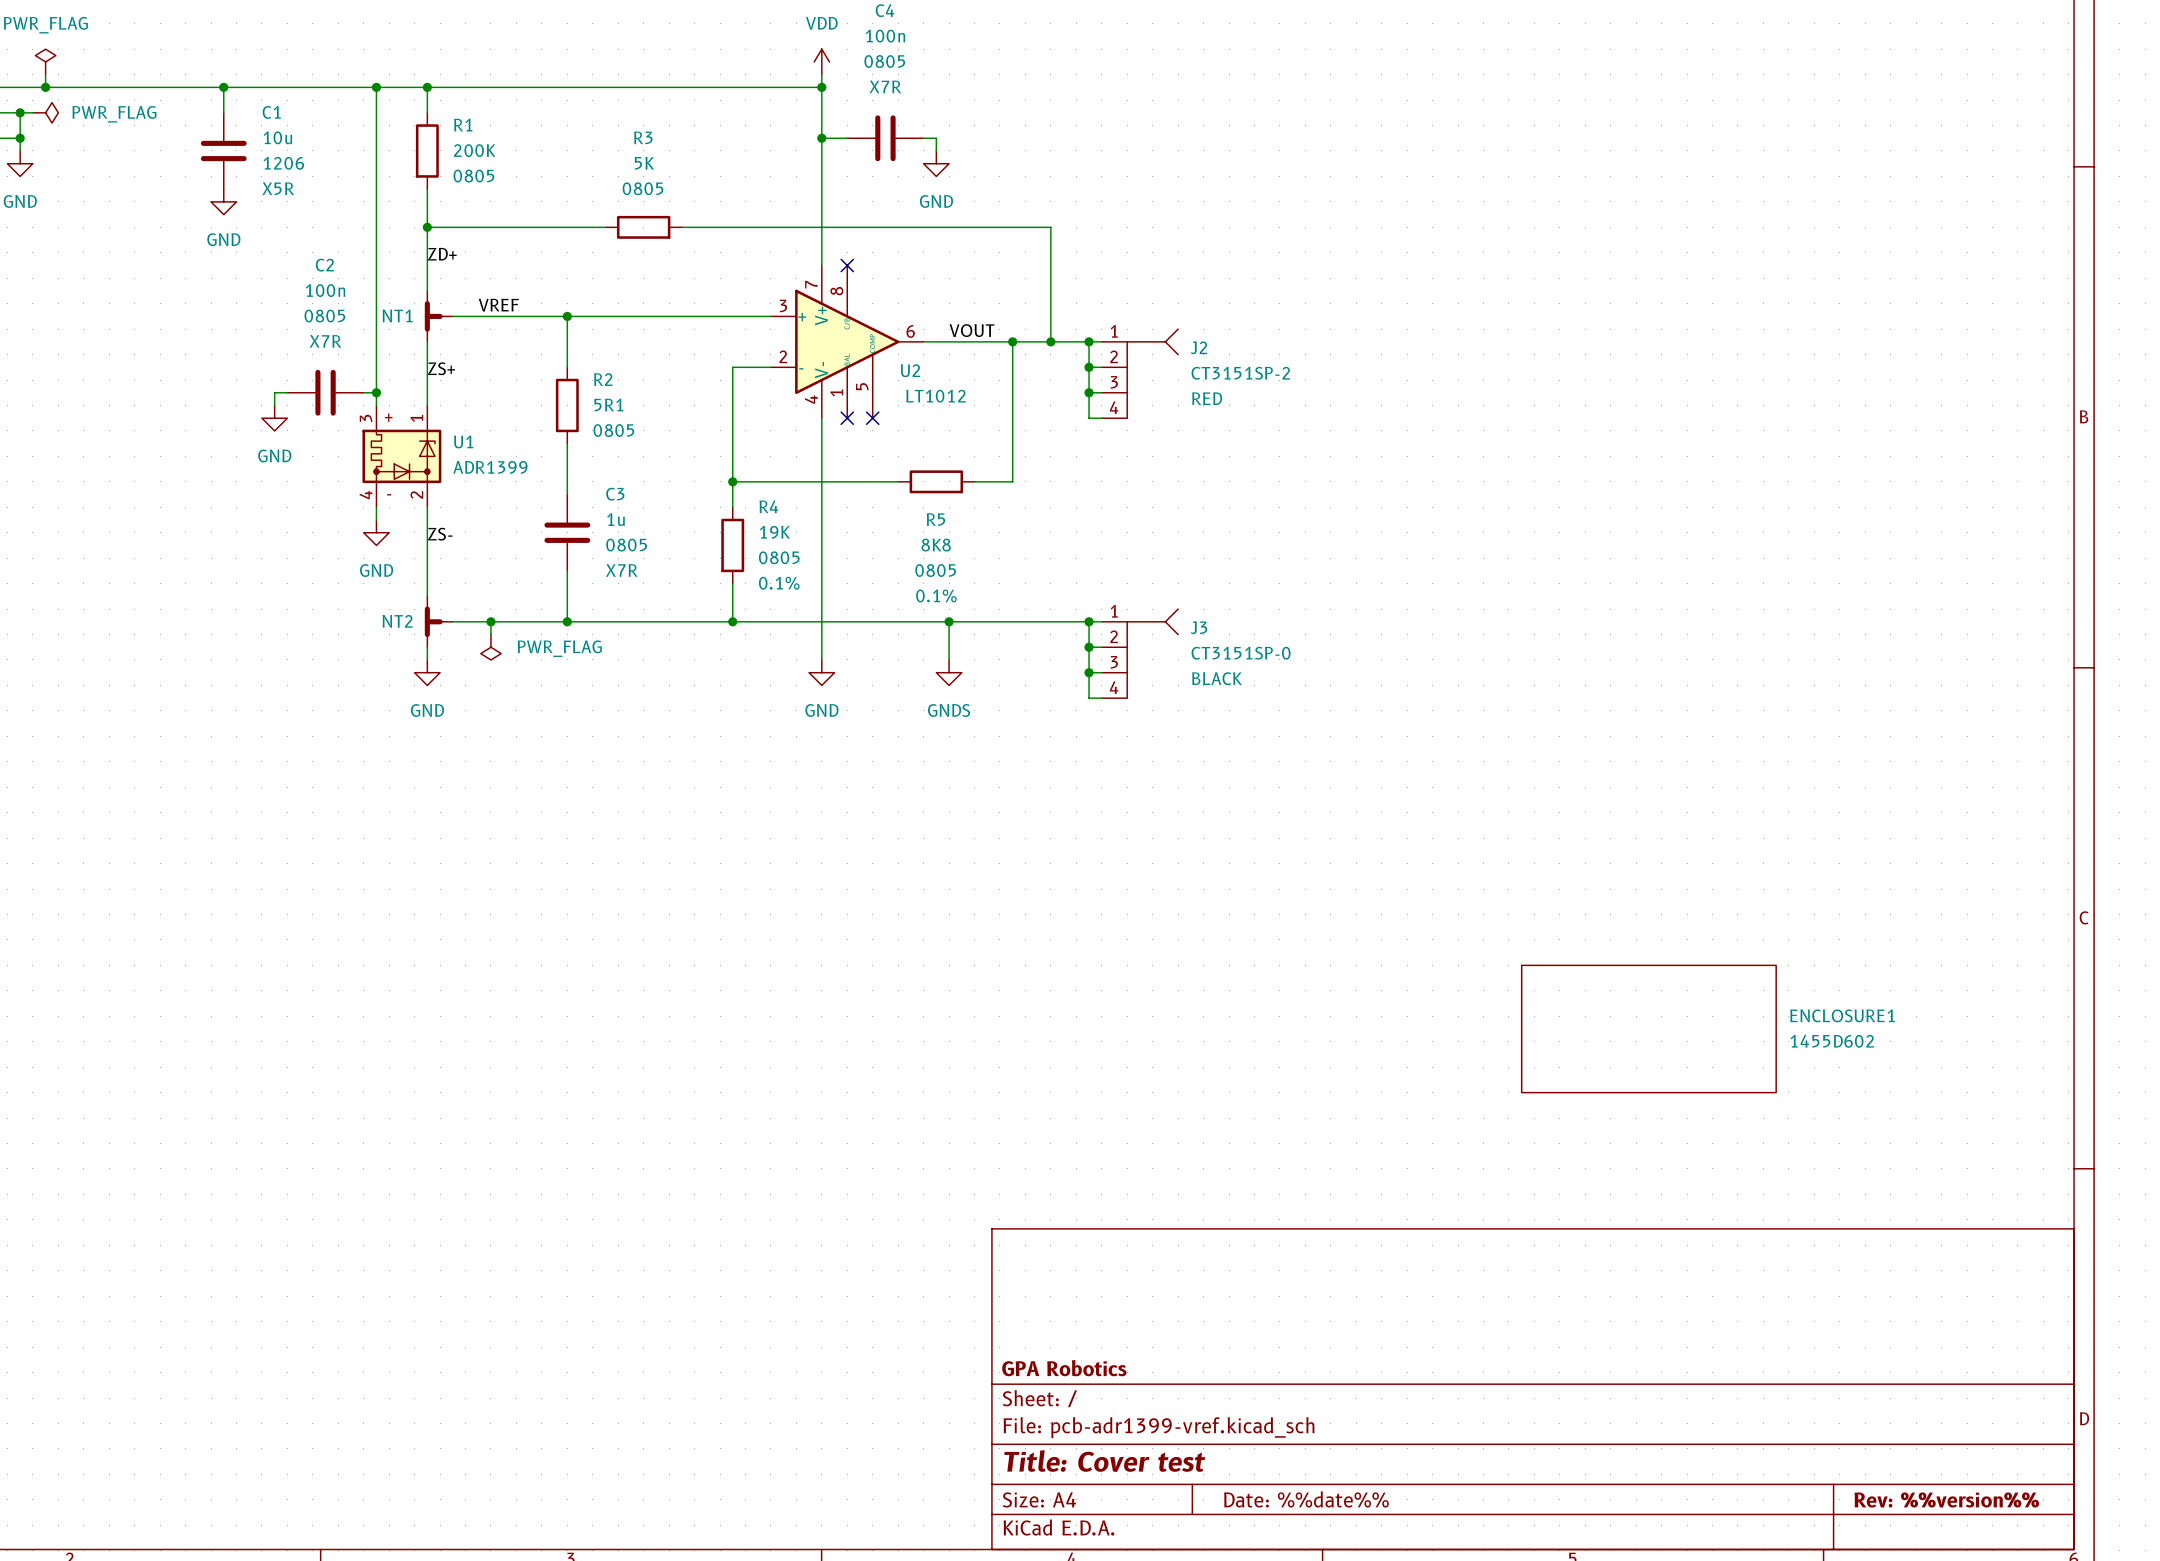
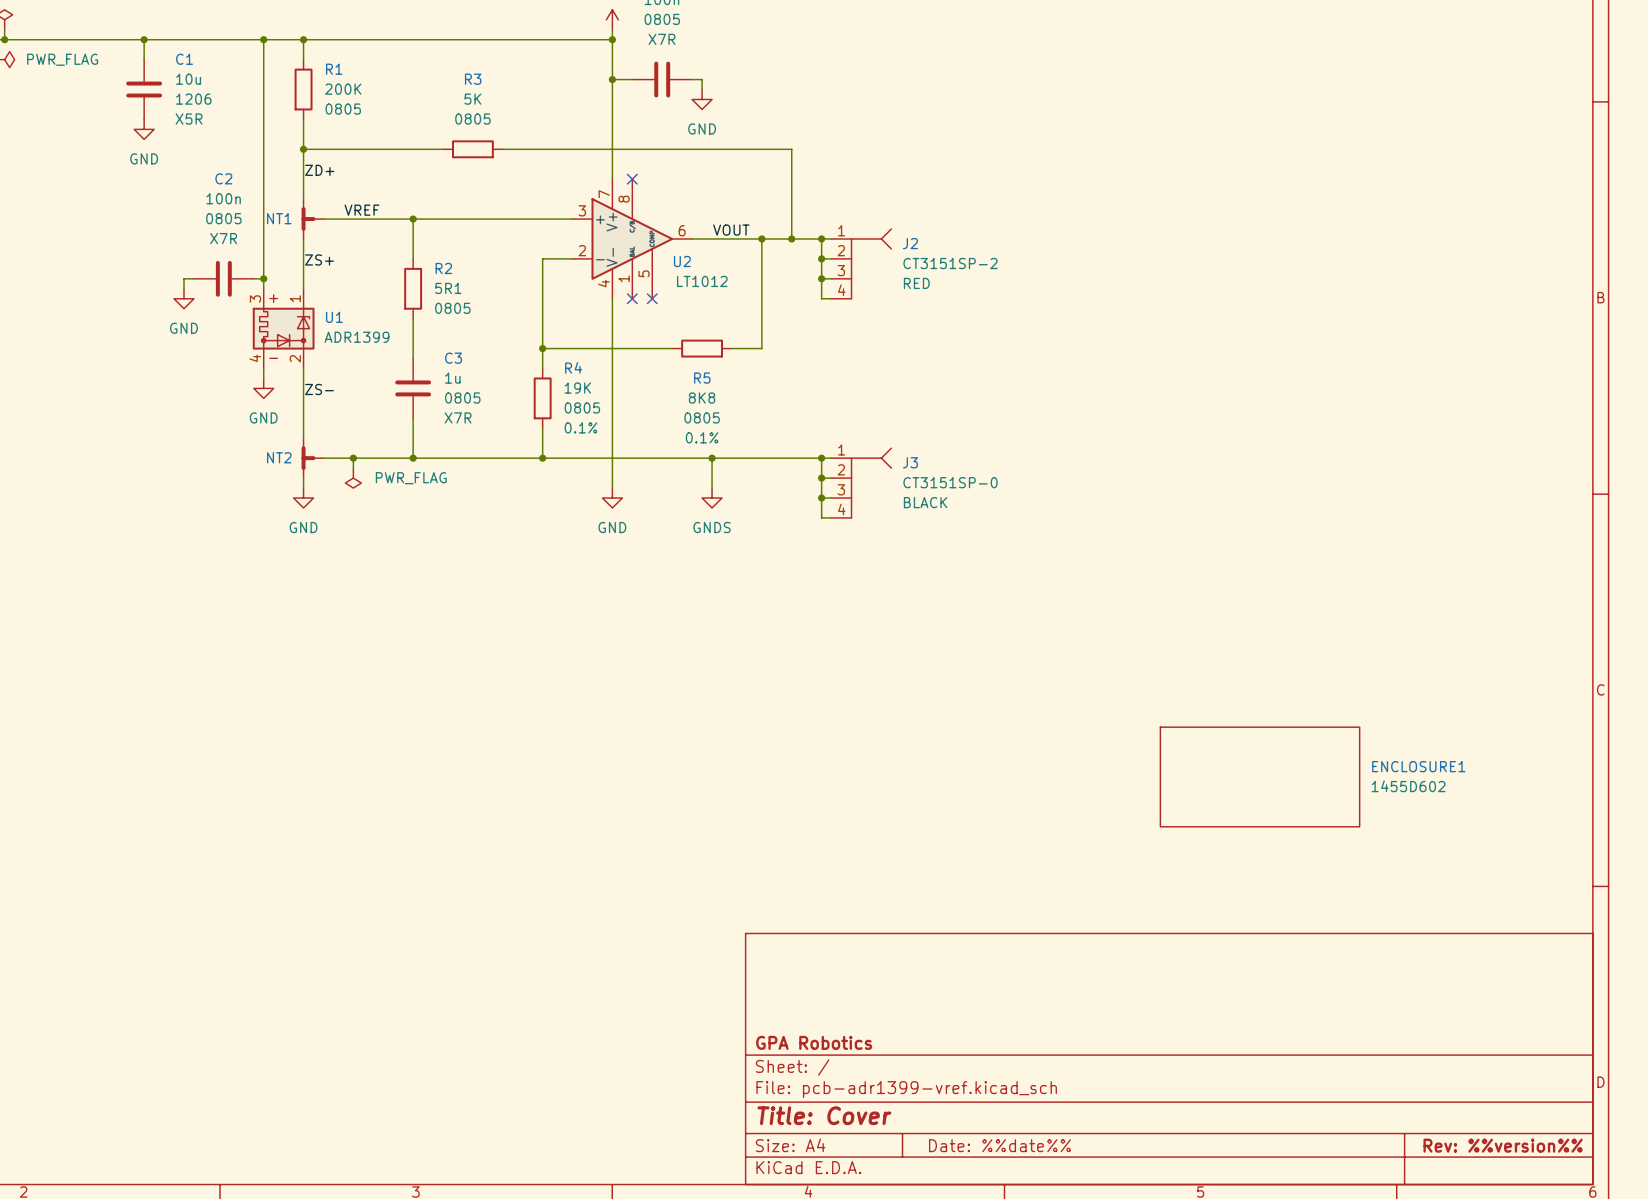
title block: Title: Cover test (1104, 1461) -> Title: Cover (824, 1115)

